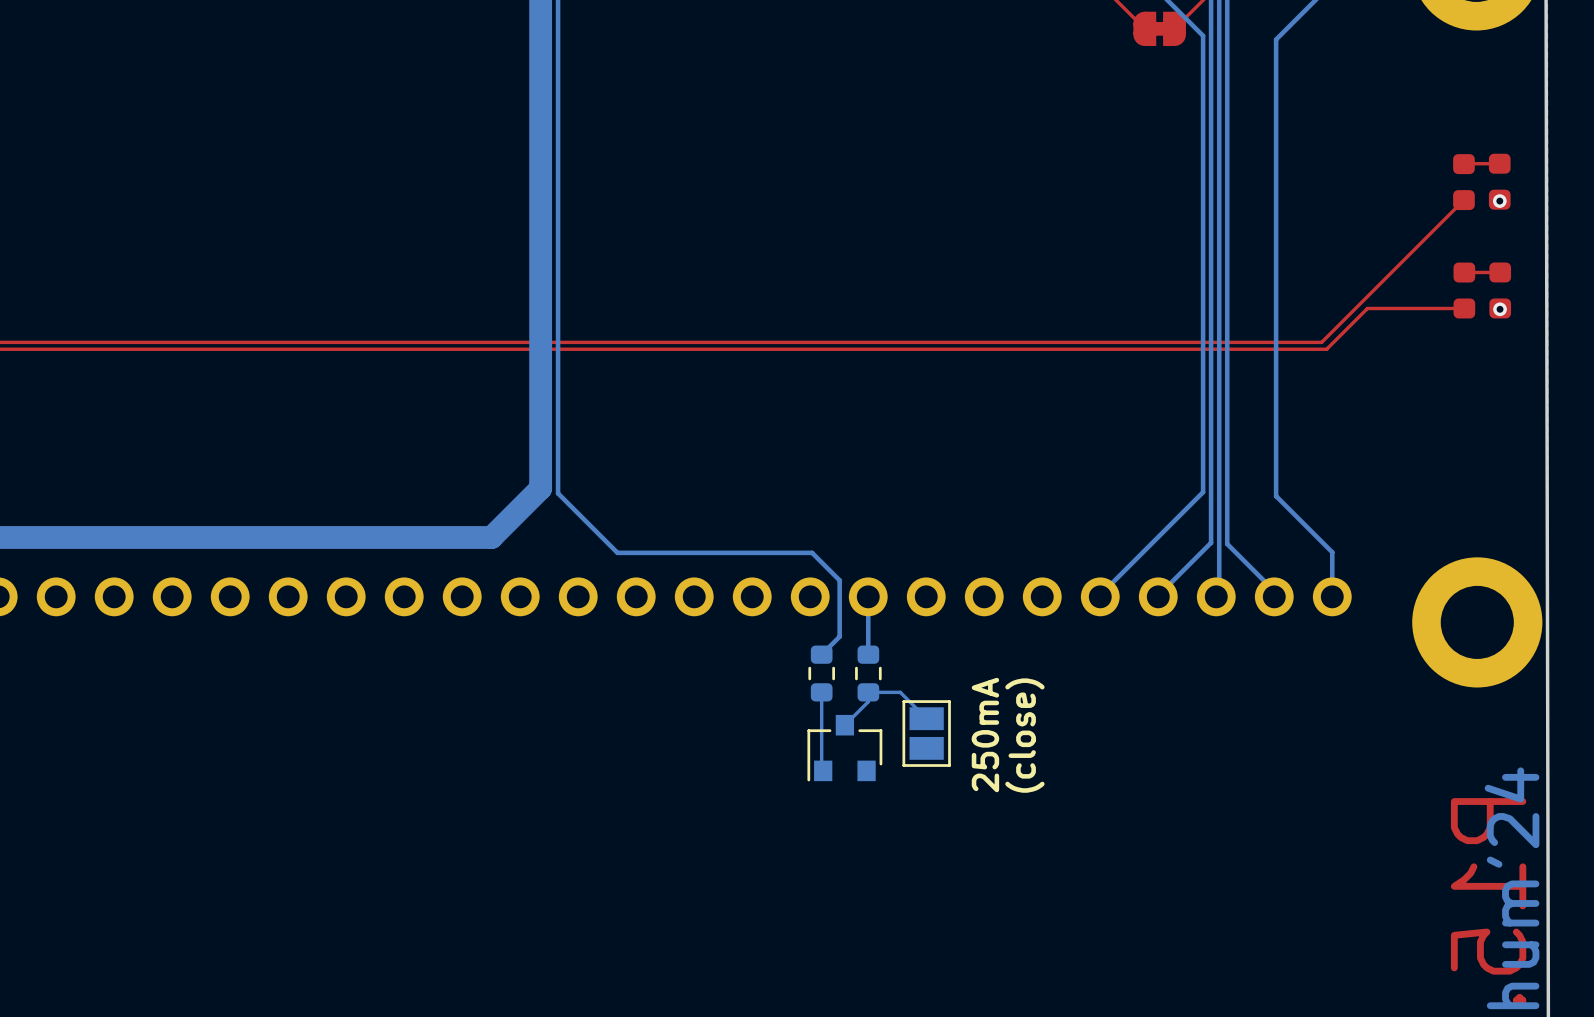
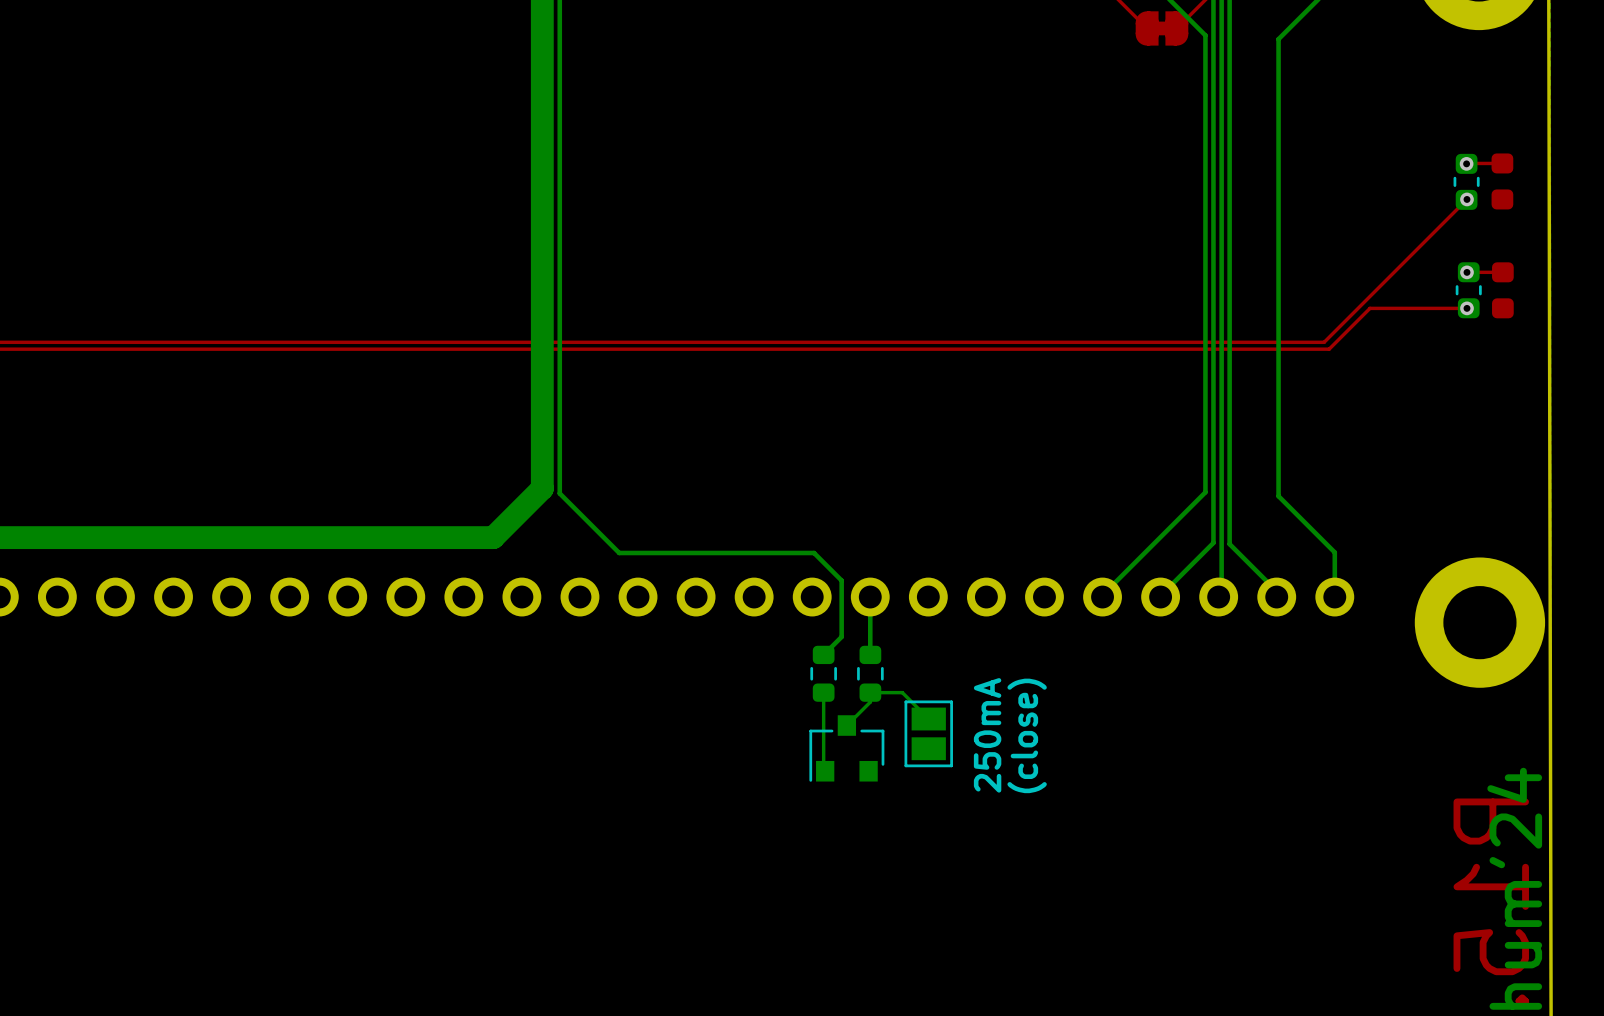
via: none -> (1466, 163)
part side: top (1463, 182) -> bottom (1466, 181)
via: none -> (1467, 199)
via: (1499, 201) -> none
via: none -> (1467, 272)
part side: top (1464, 290) -> bottom (1468, 290)
via: none -> (1467, 308)
via: (1500, 309) -> none

